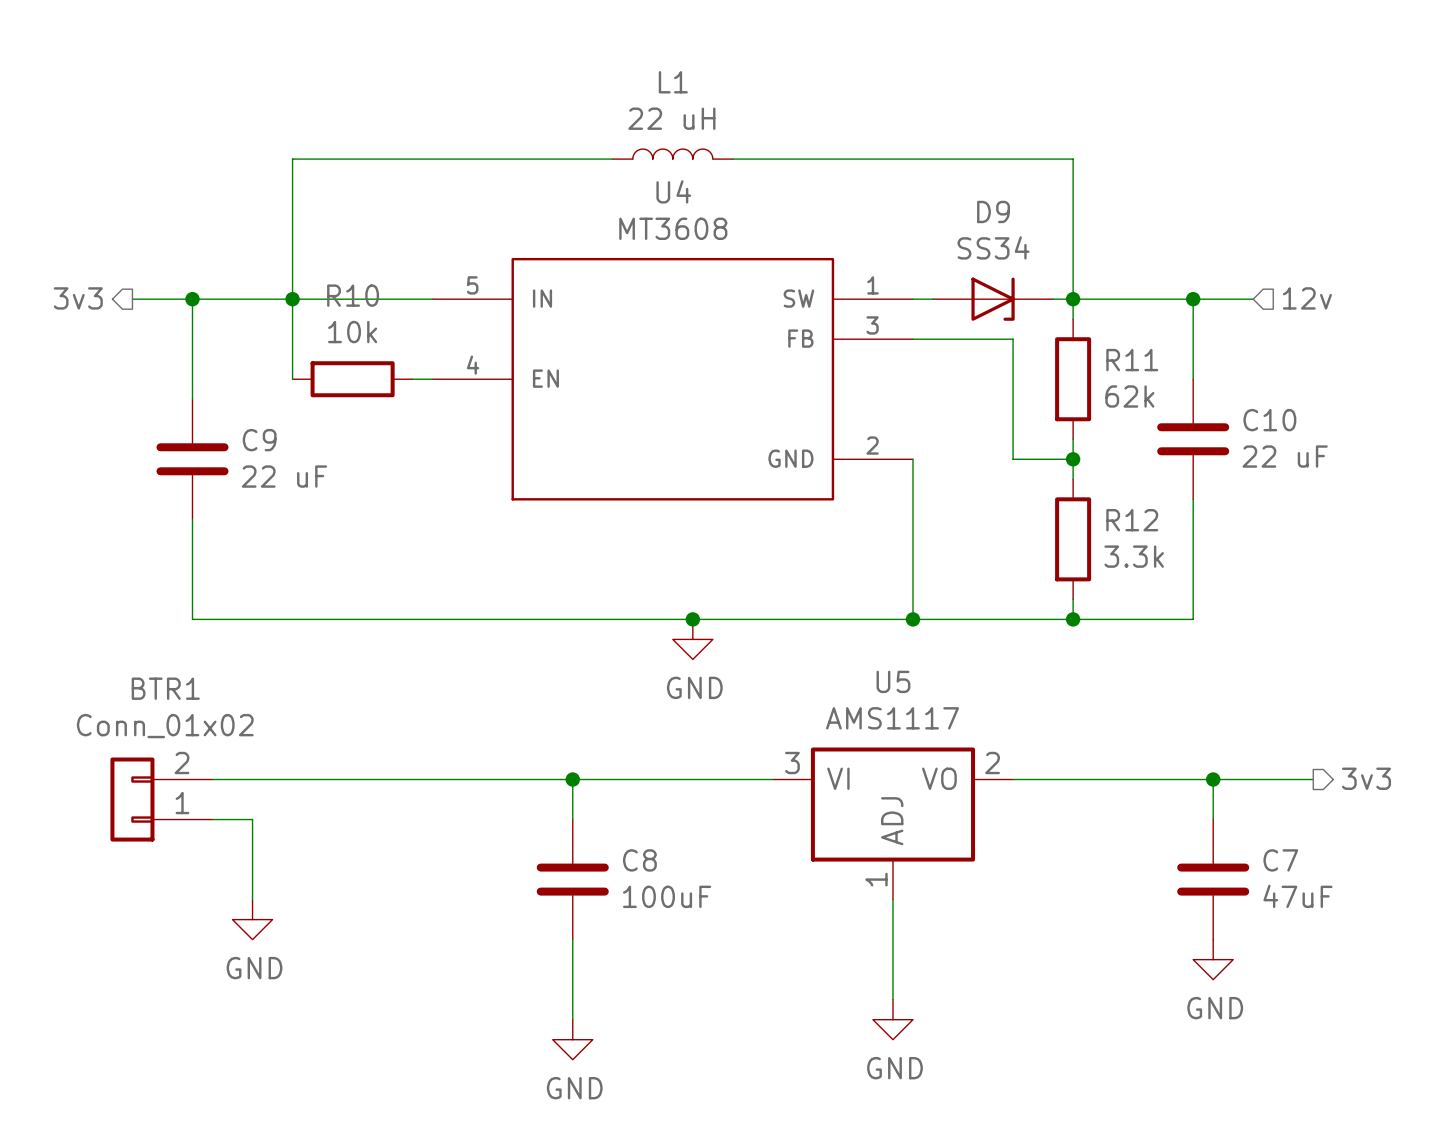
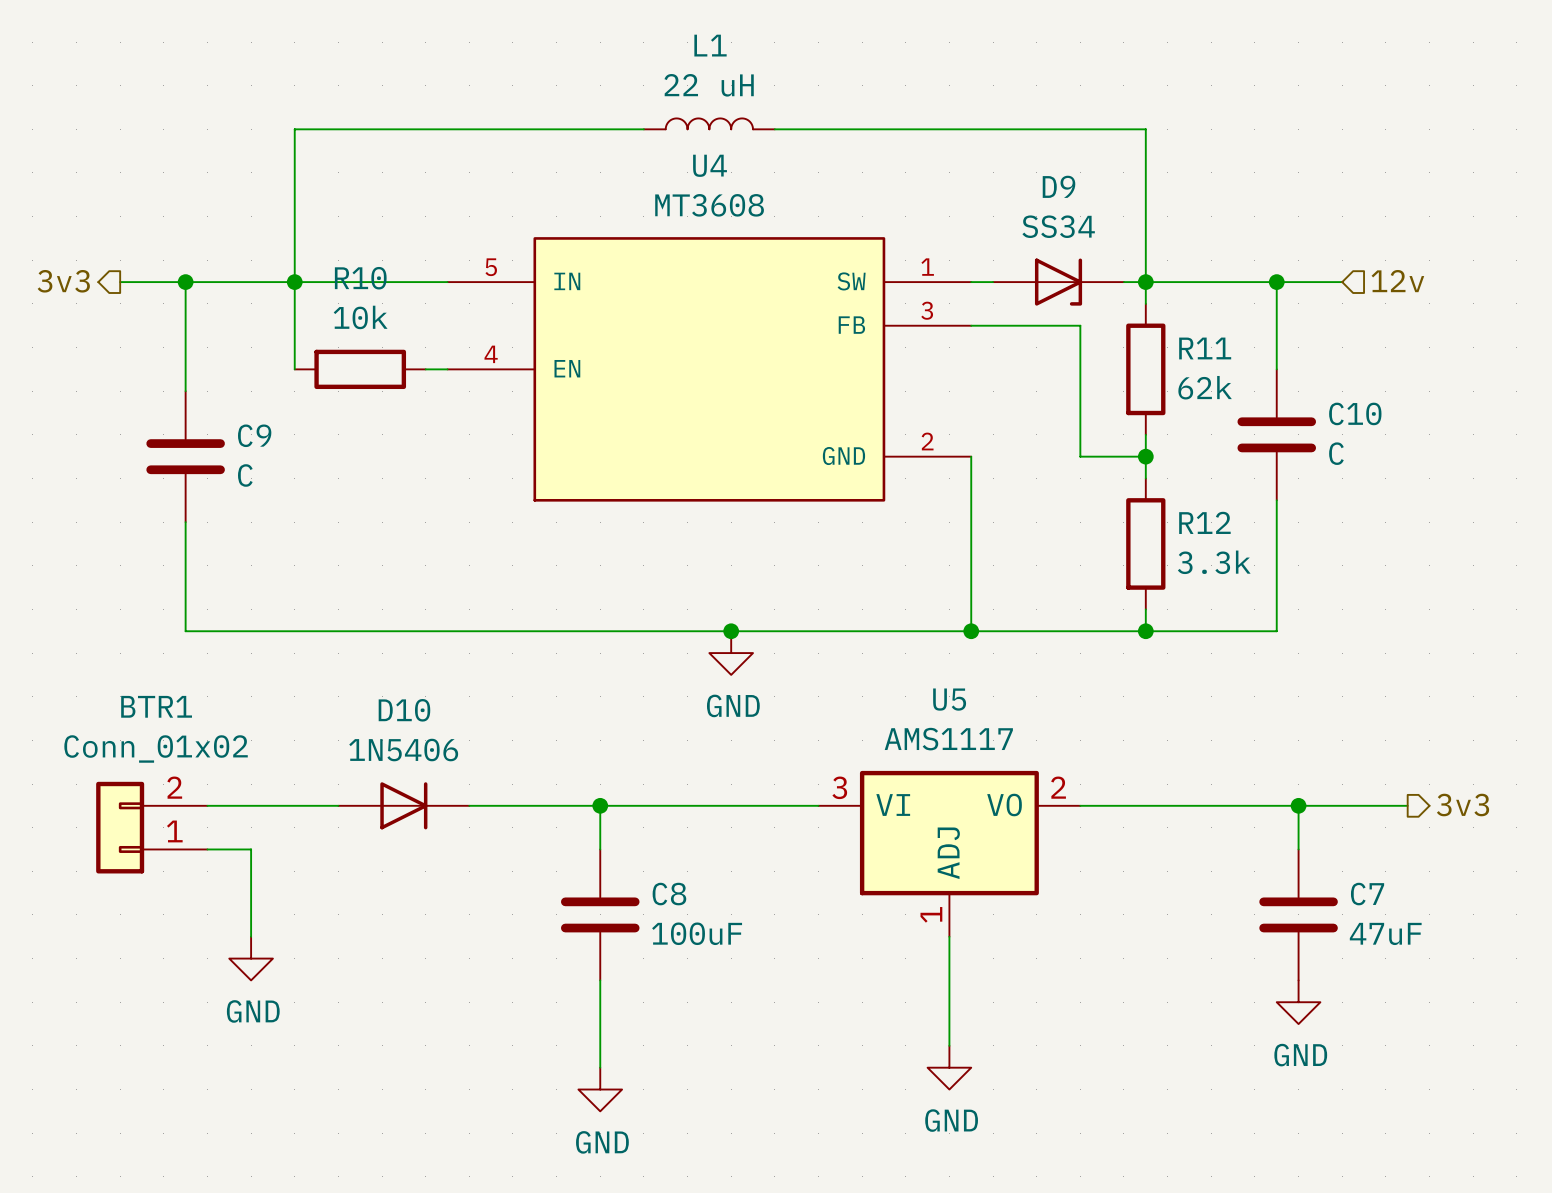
C10 value: 22 uF (1285, 456) -> C (1336, 453)
C9 value: 22 uF (284, 476) -> C (245, 475)
D10: none -> 1N5406 (403, 805)

